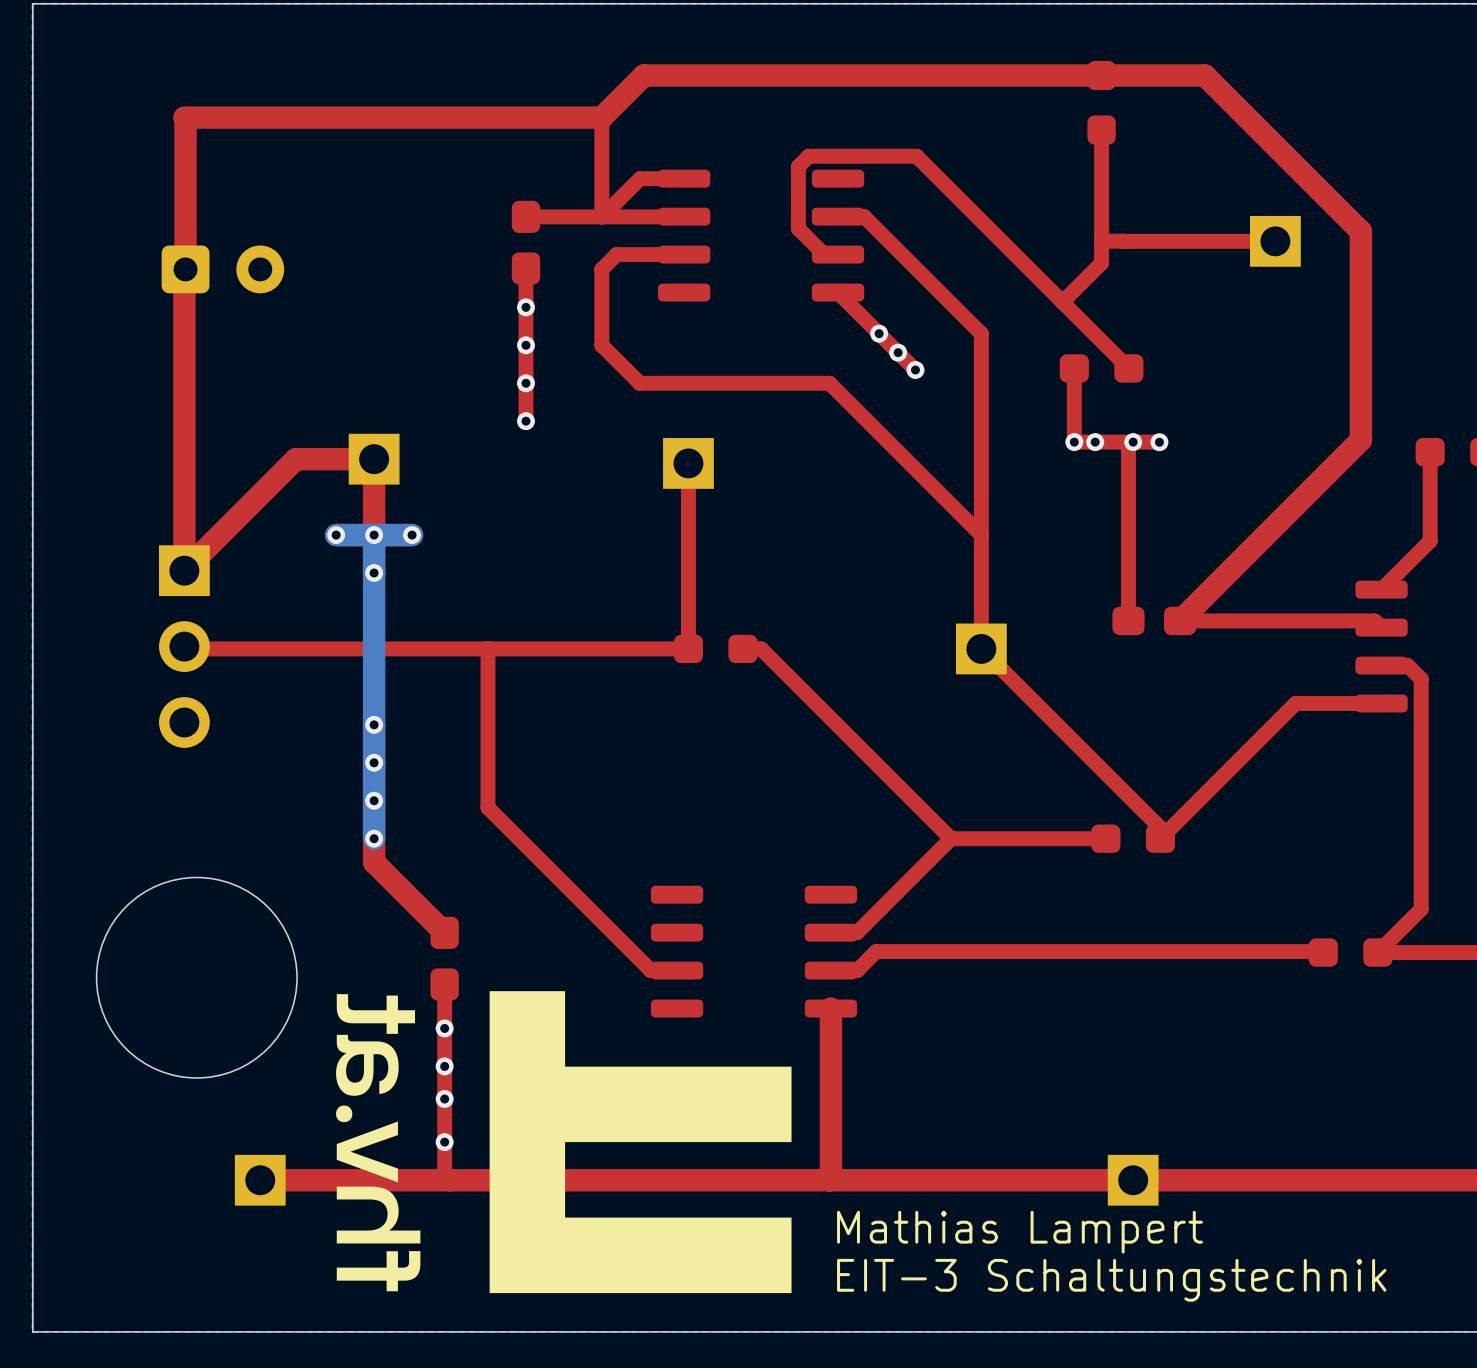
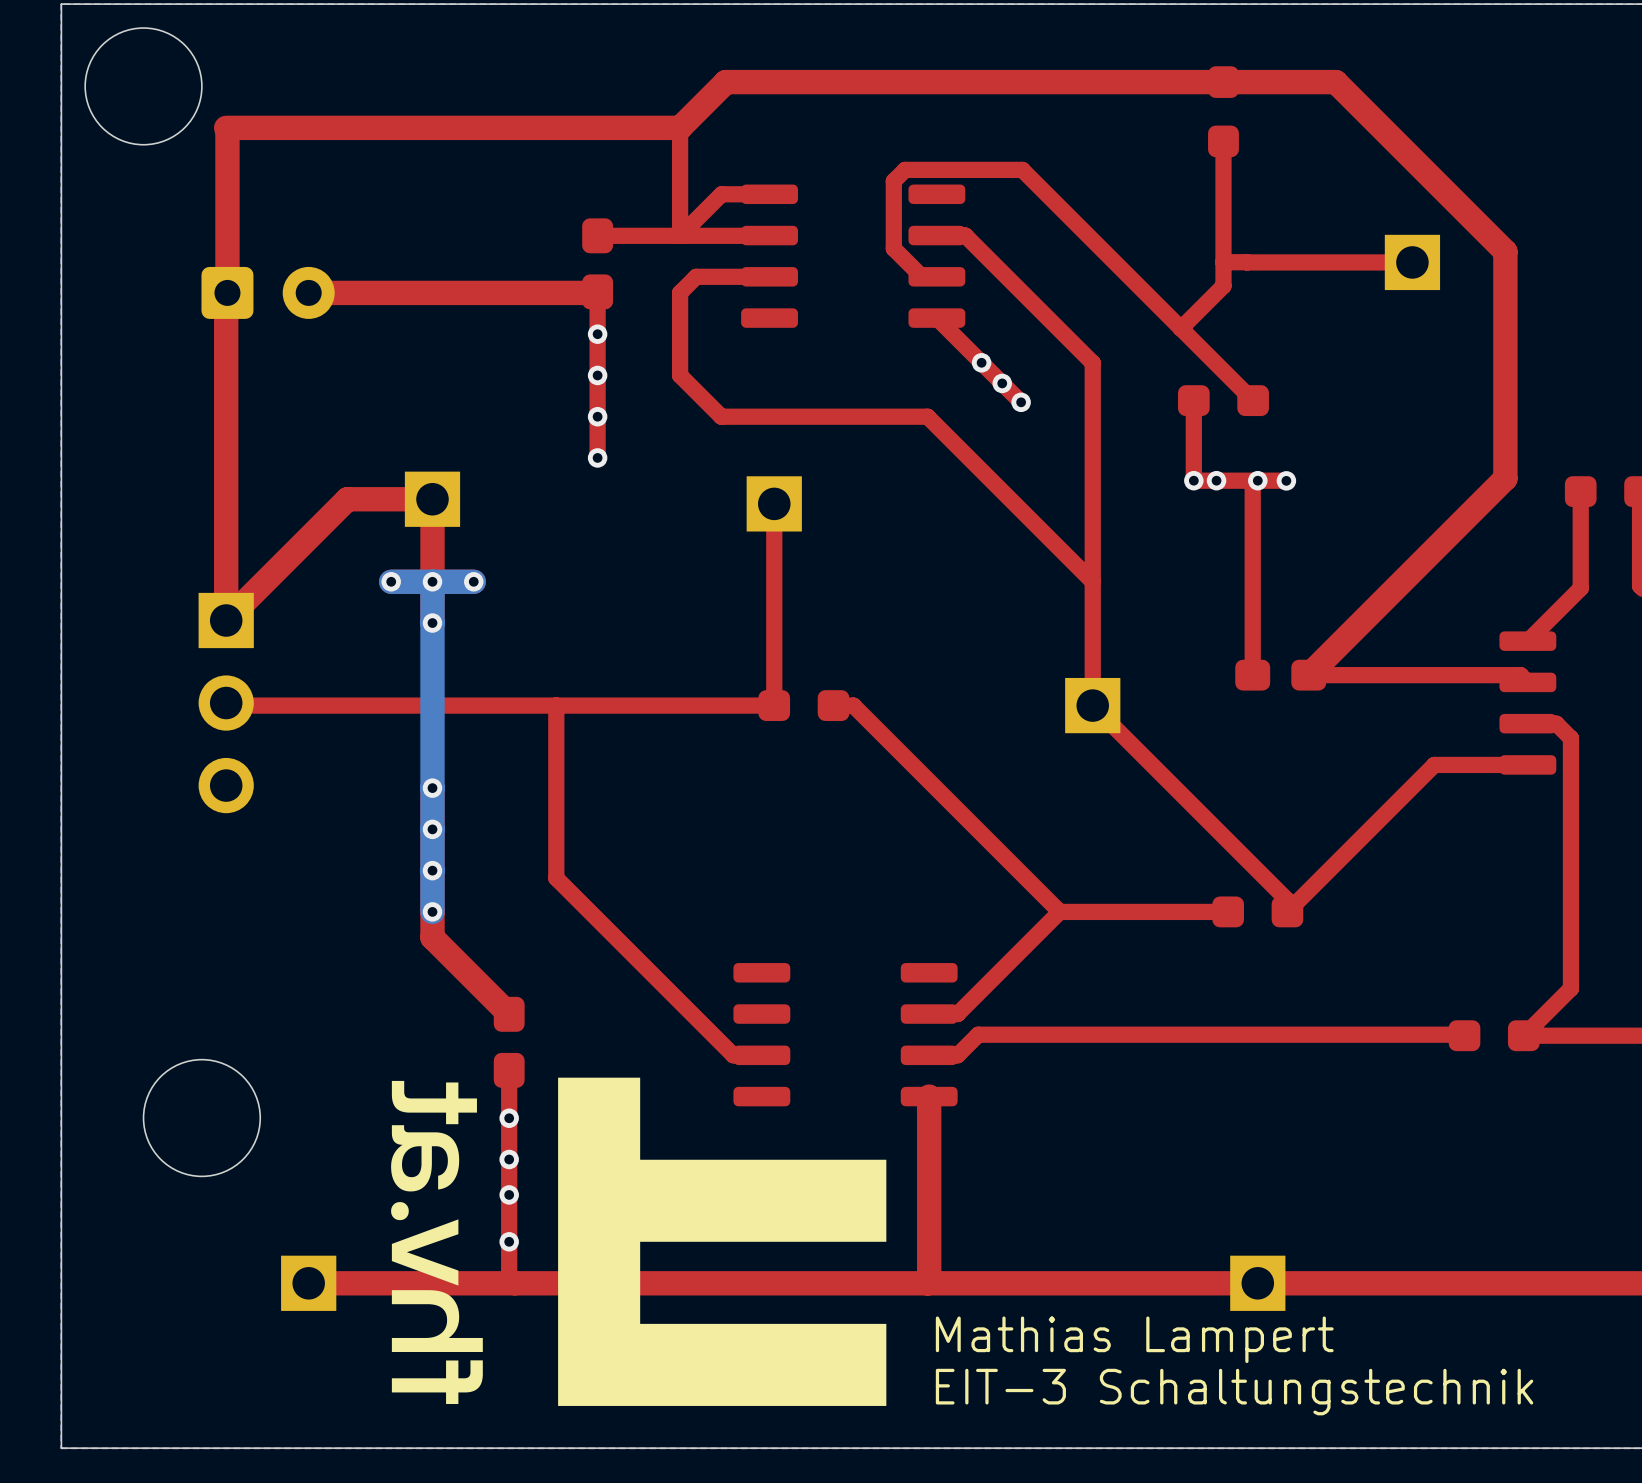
round board edge: none -> [84, 27, 203, 146]
top track: none -> (596, 292) (308, 292)
round board edge: [95, 876, 298, 1079] -> none
round board edge: none -> [142, 1058, 262, 1178]

